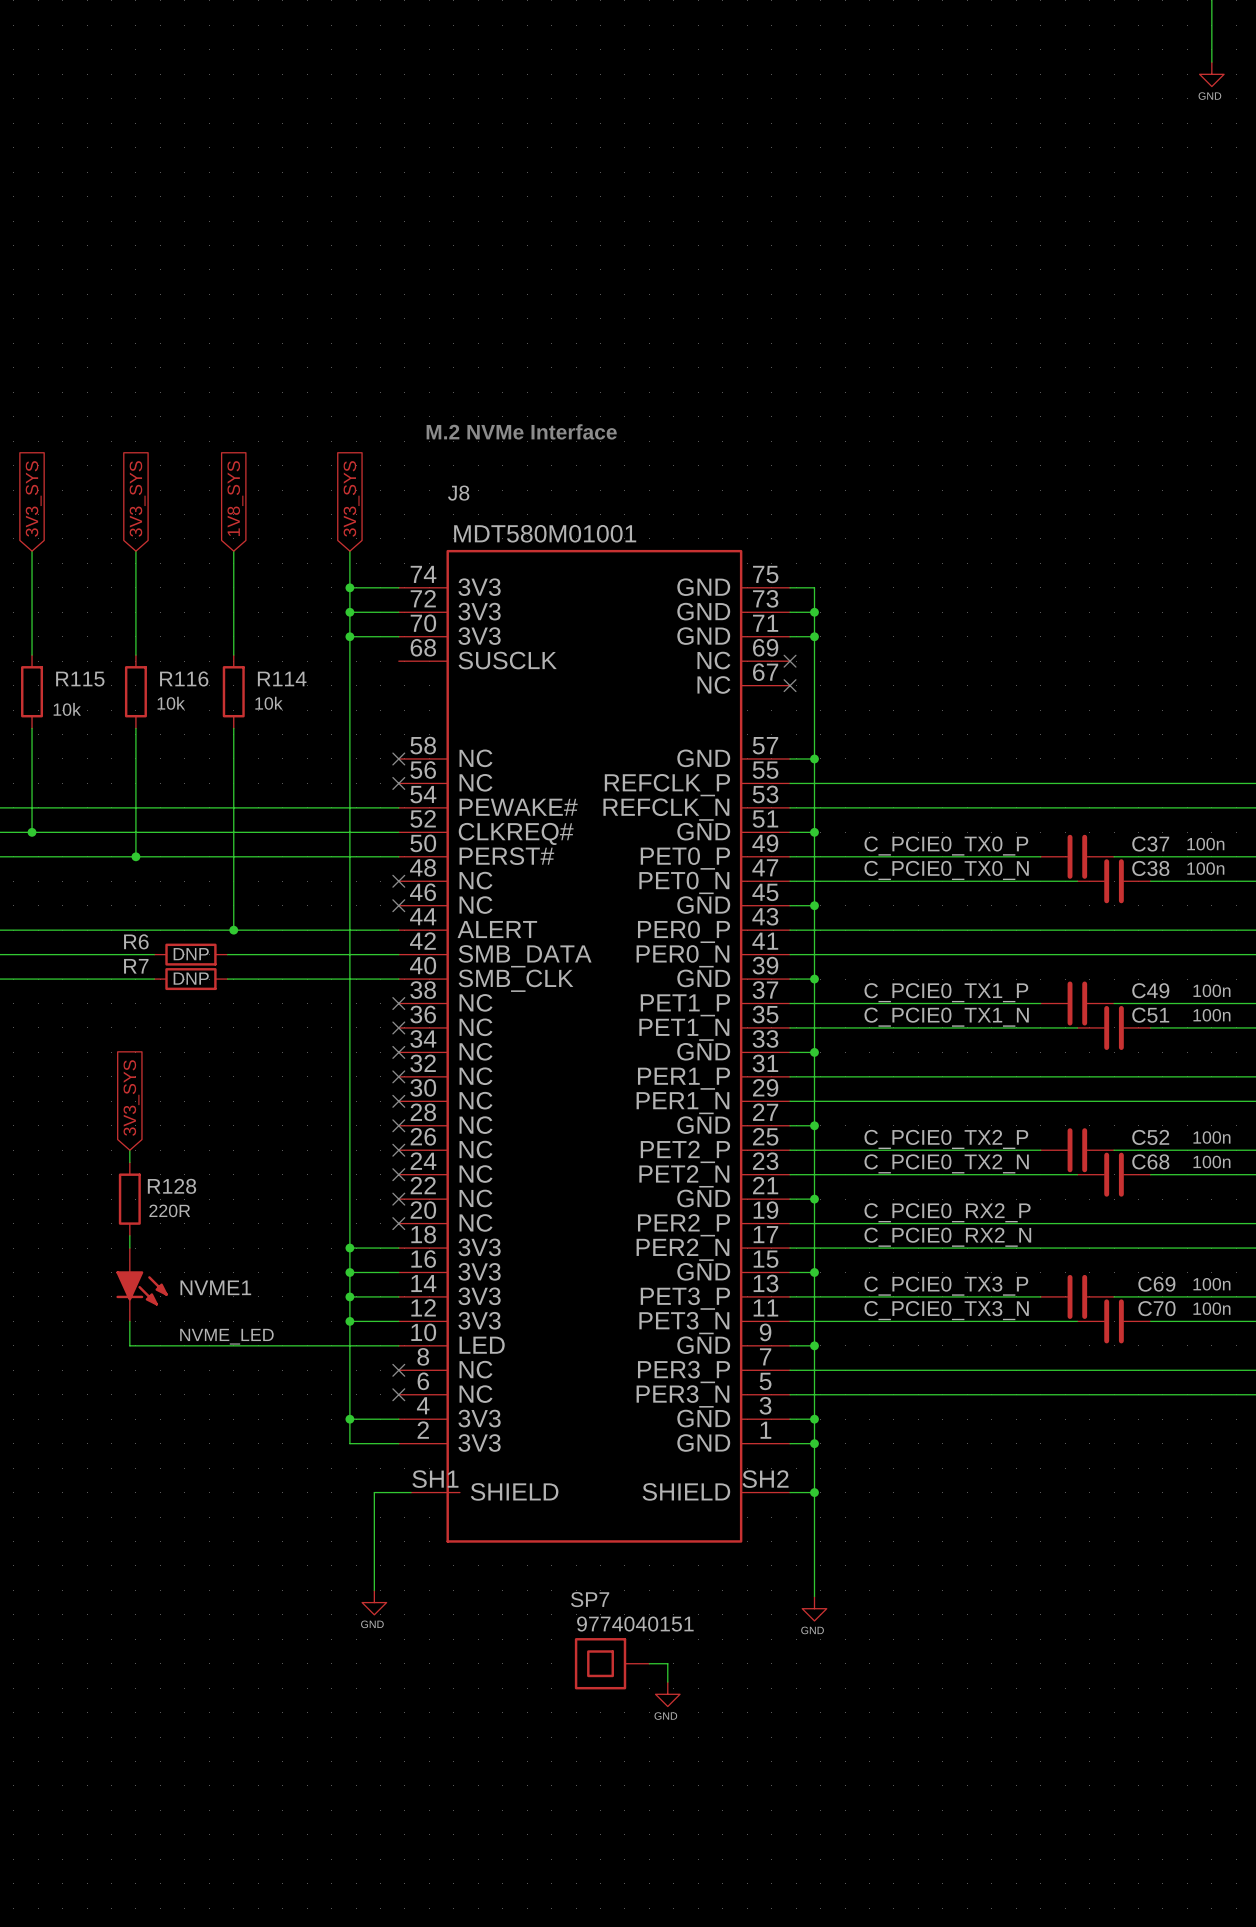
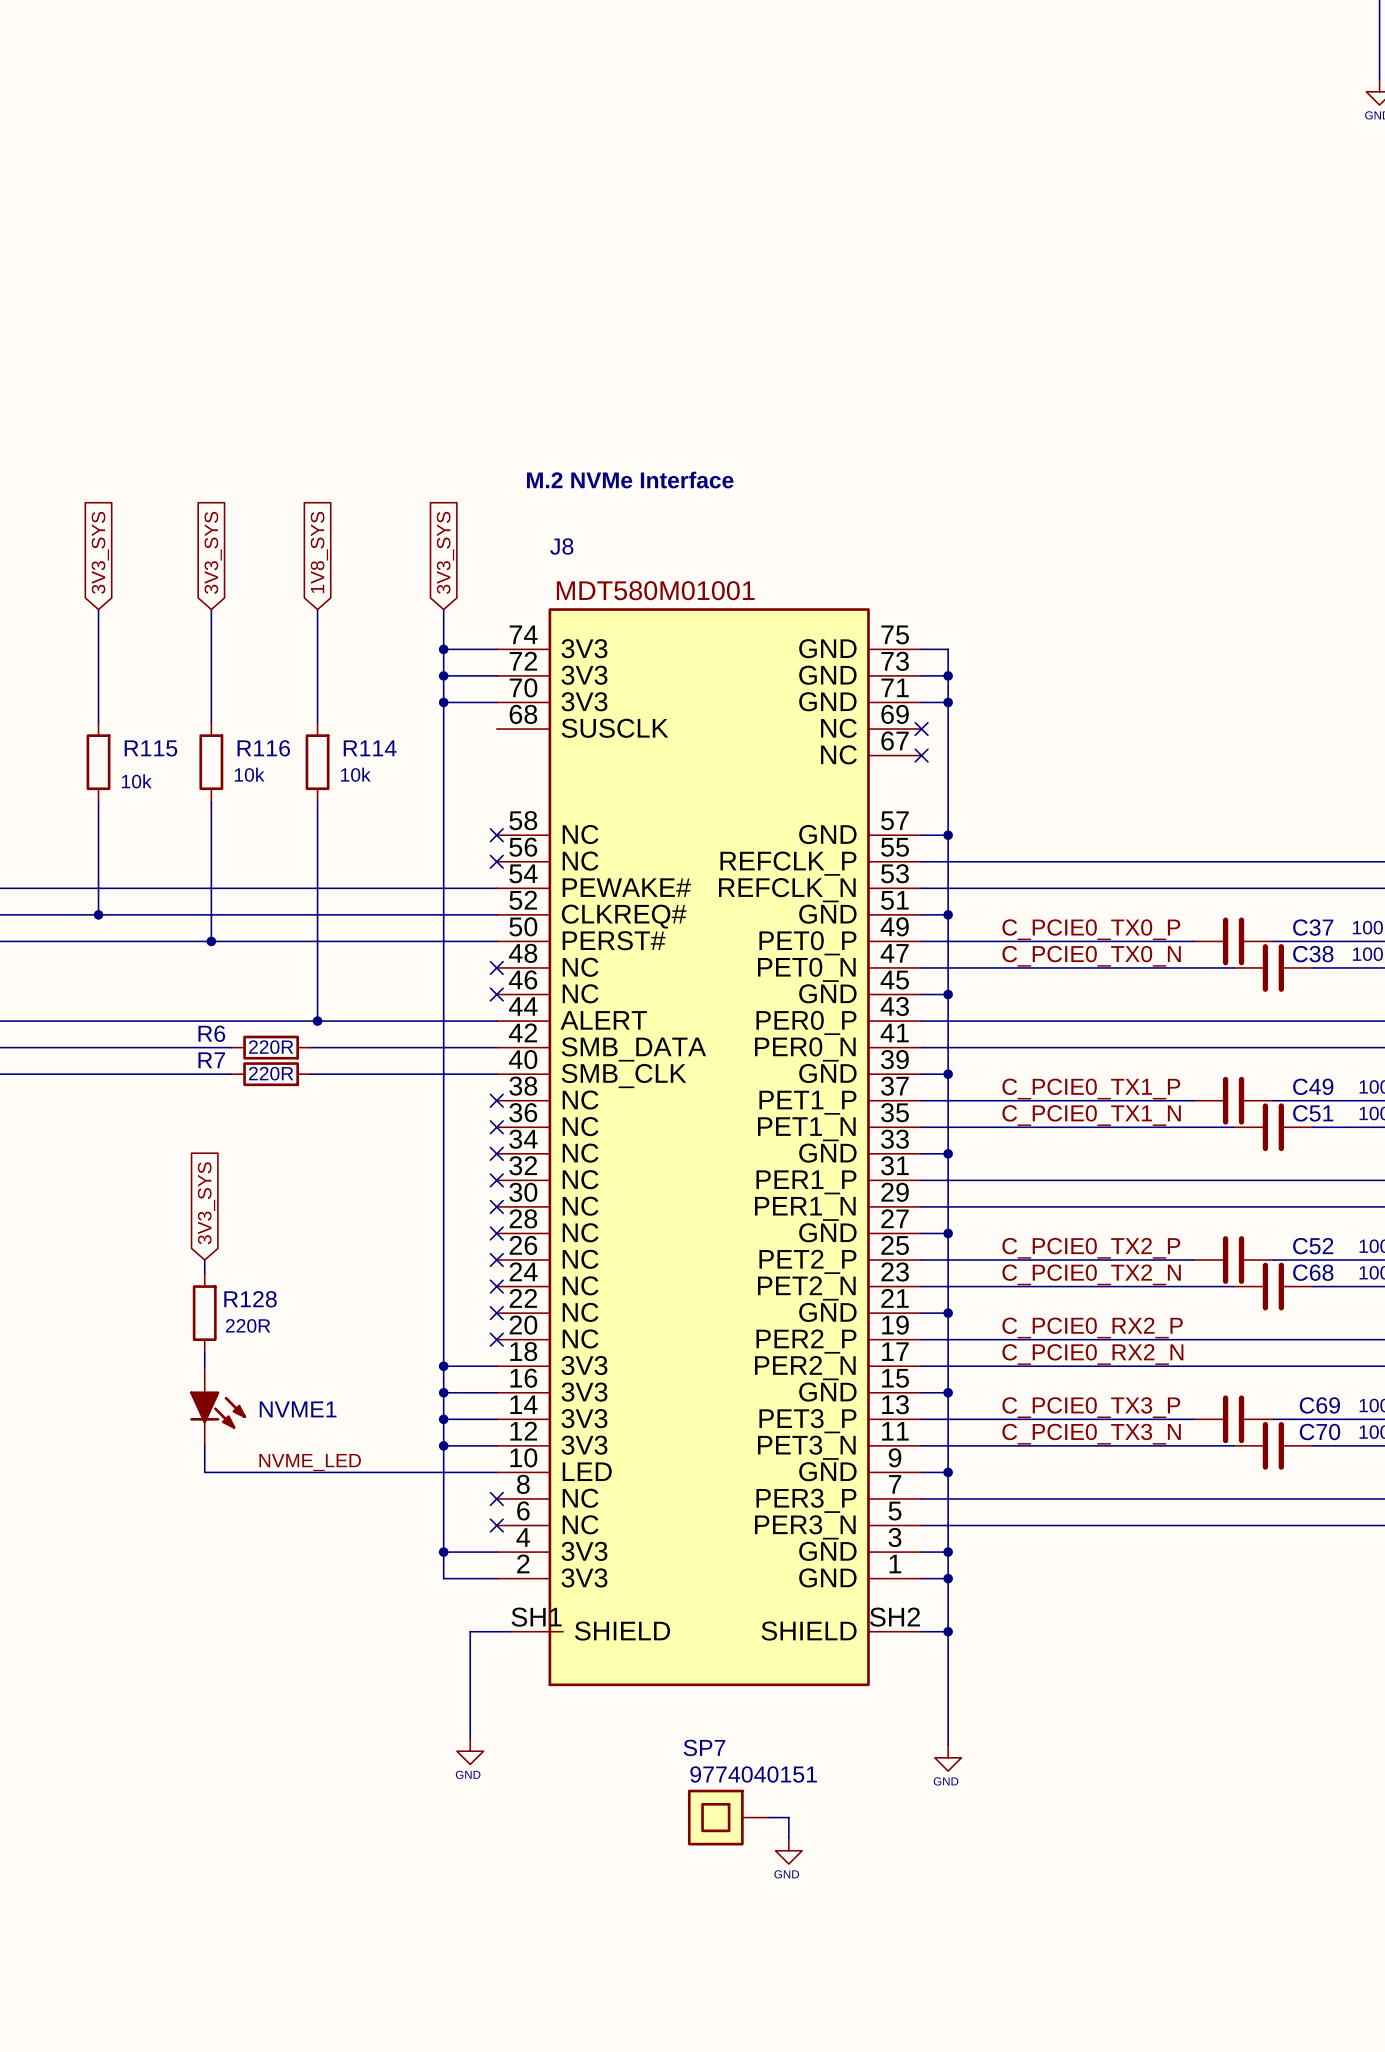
R6 text: DNP (191, 954) -> 220R (271, 1047)
R7 text: DNP (191, 978) -> 220R (271, 1073)

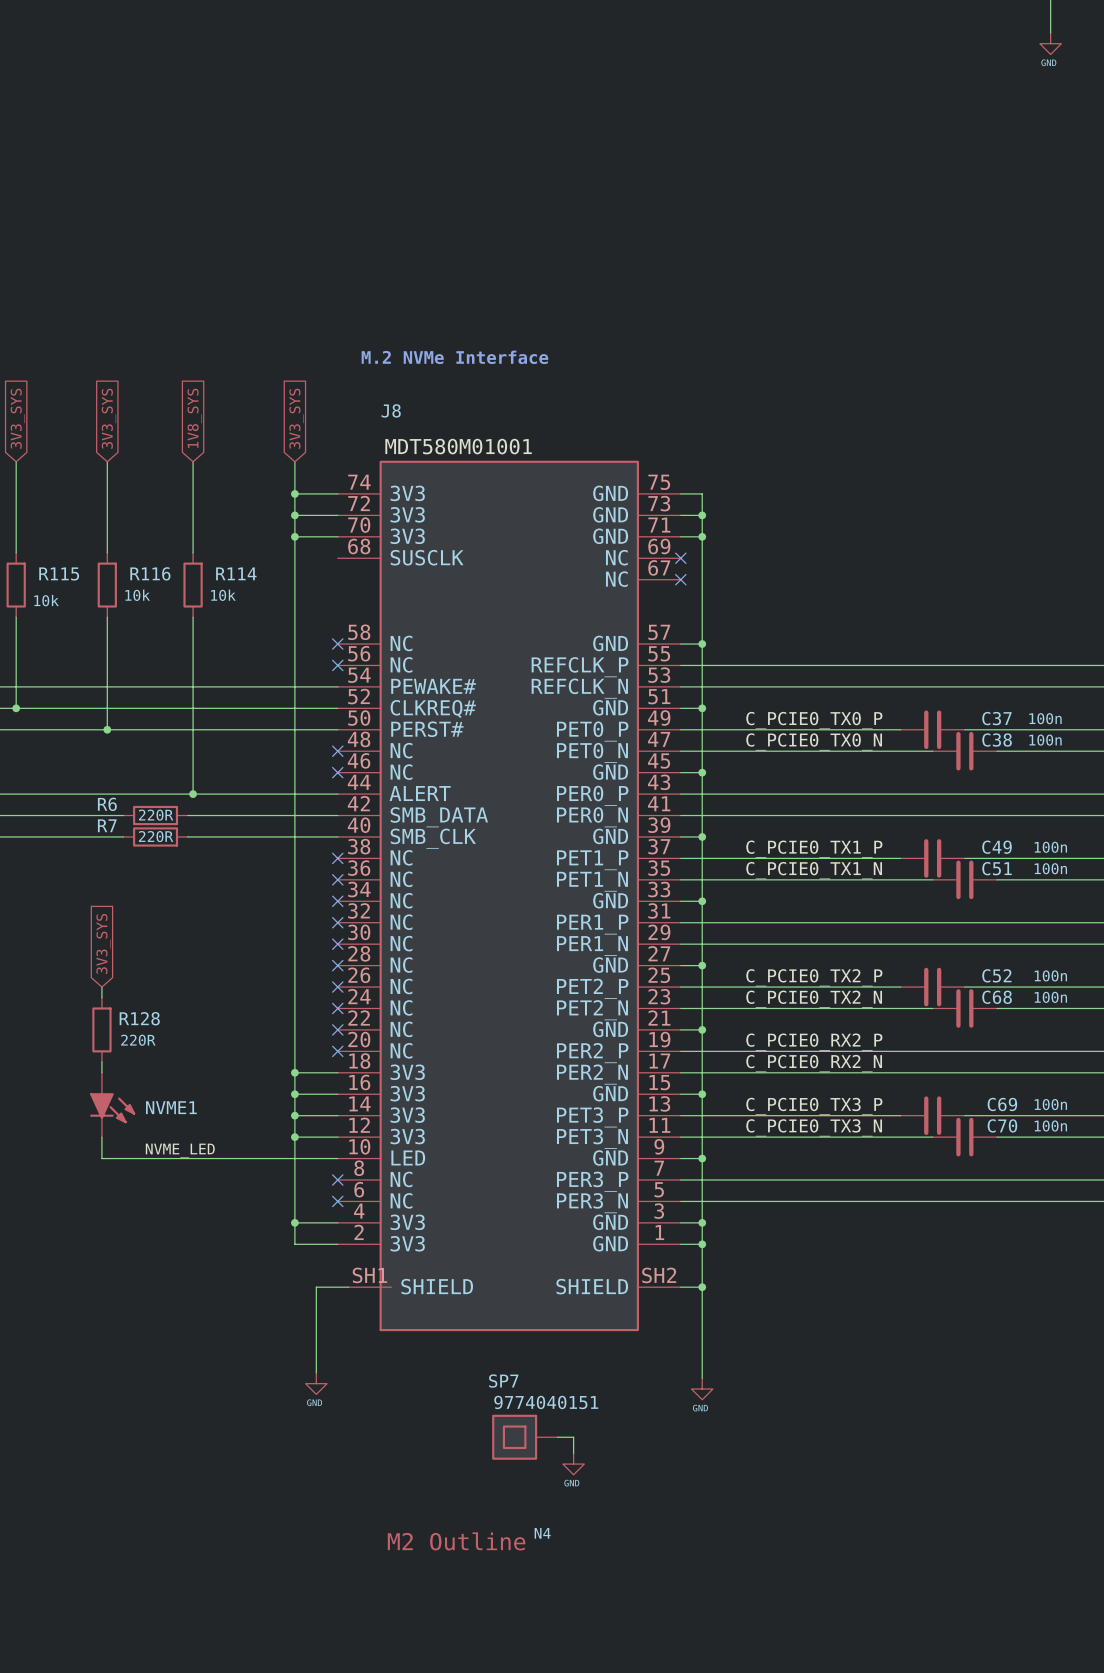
N4: none -> (469, 1539)

